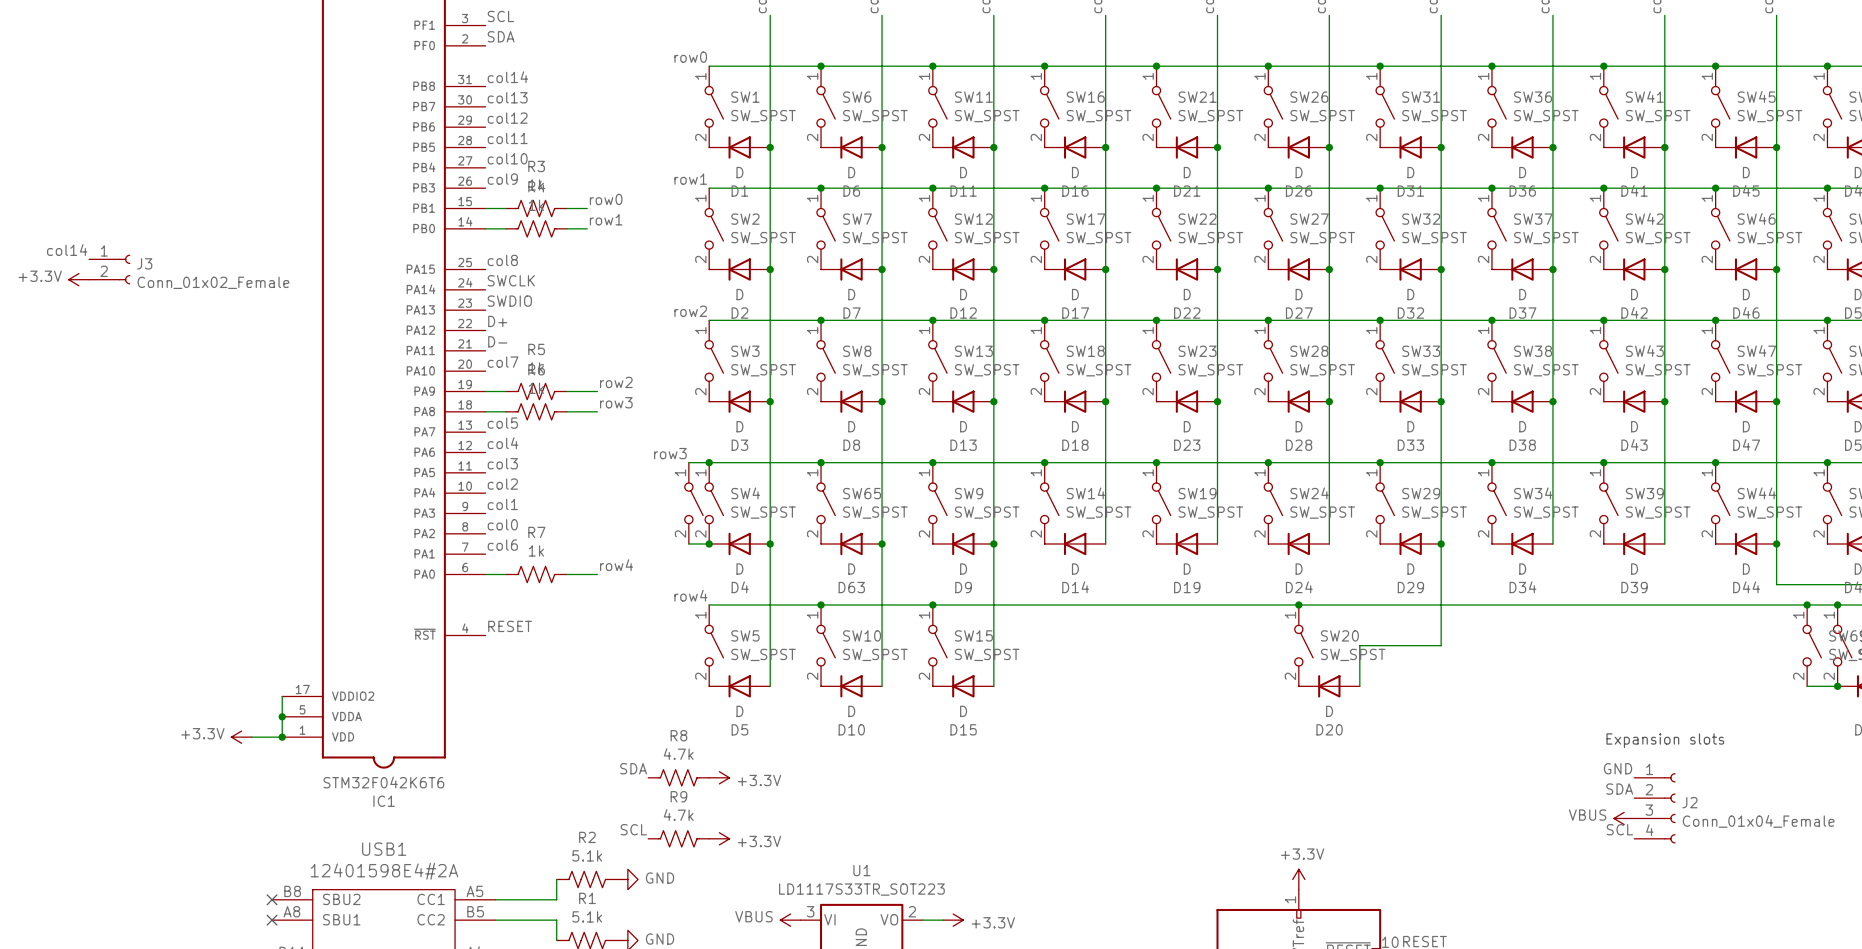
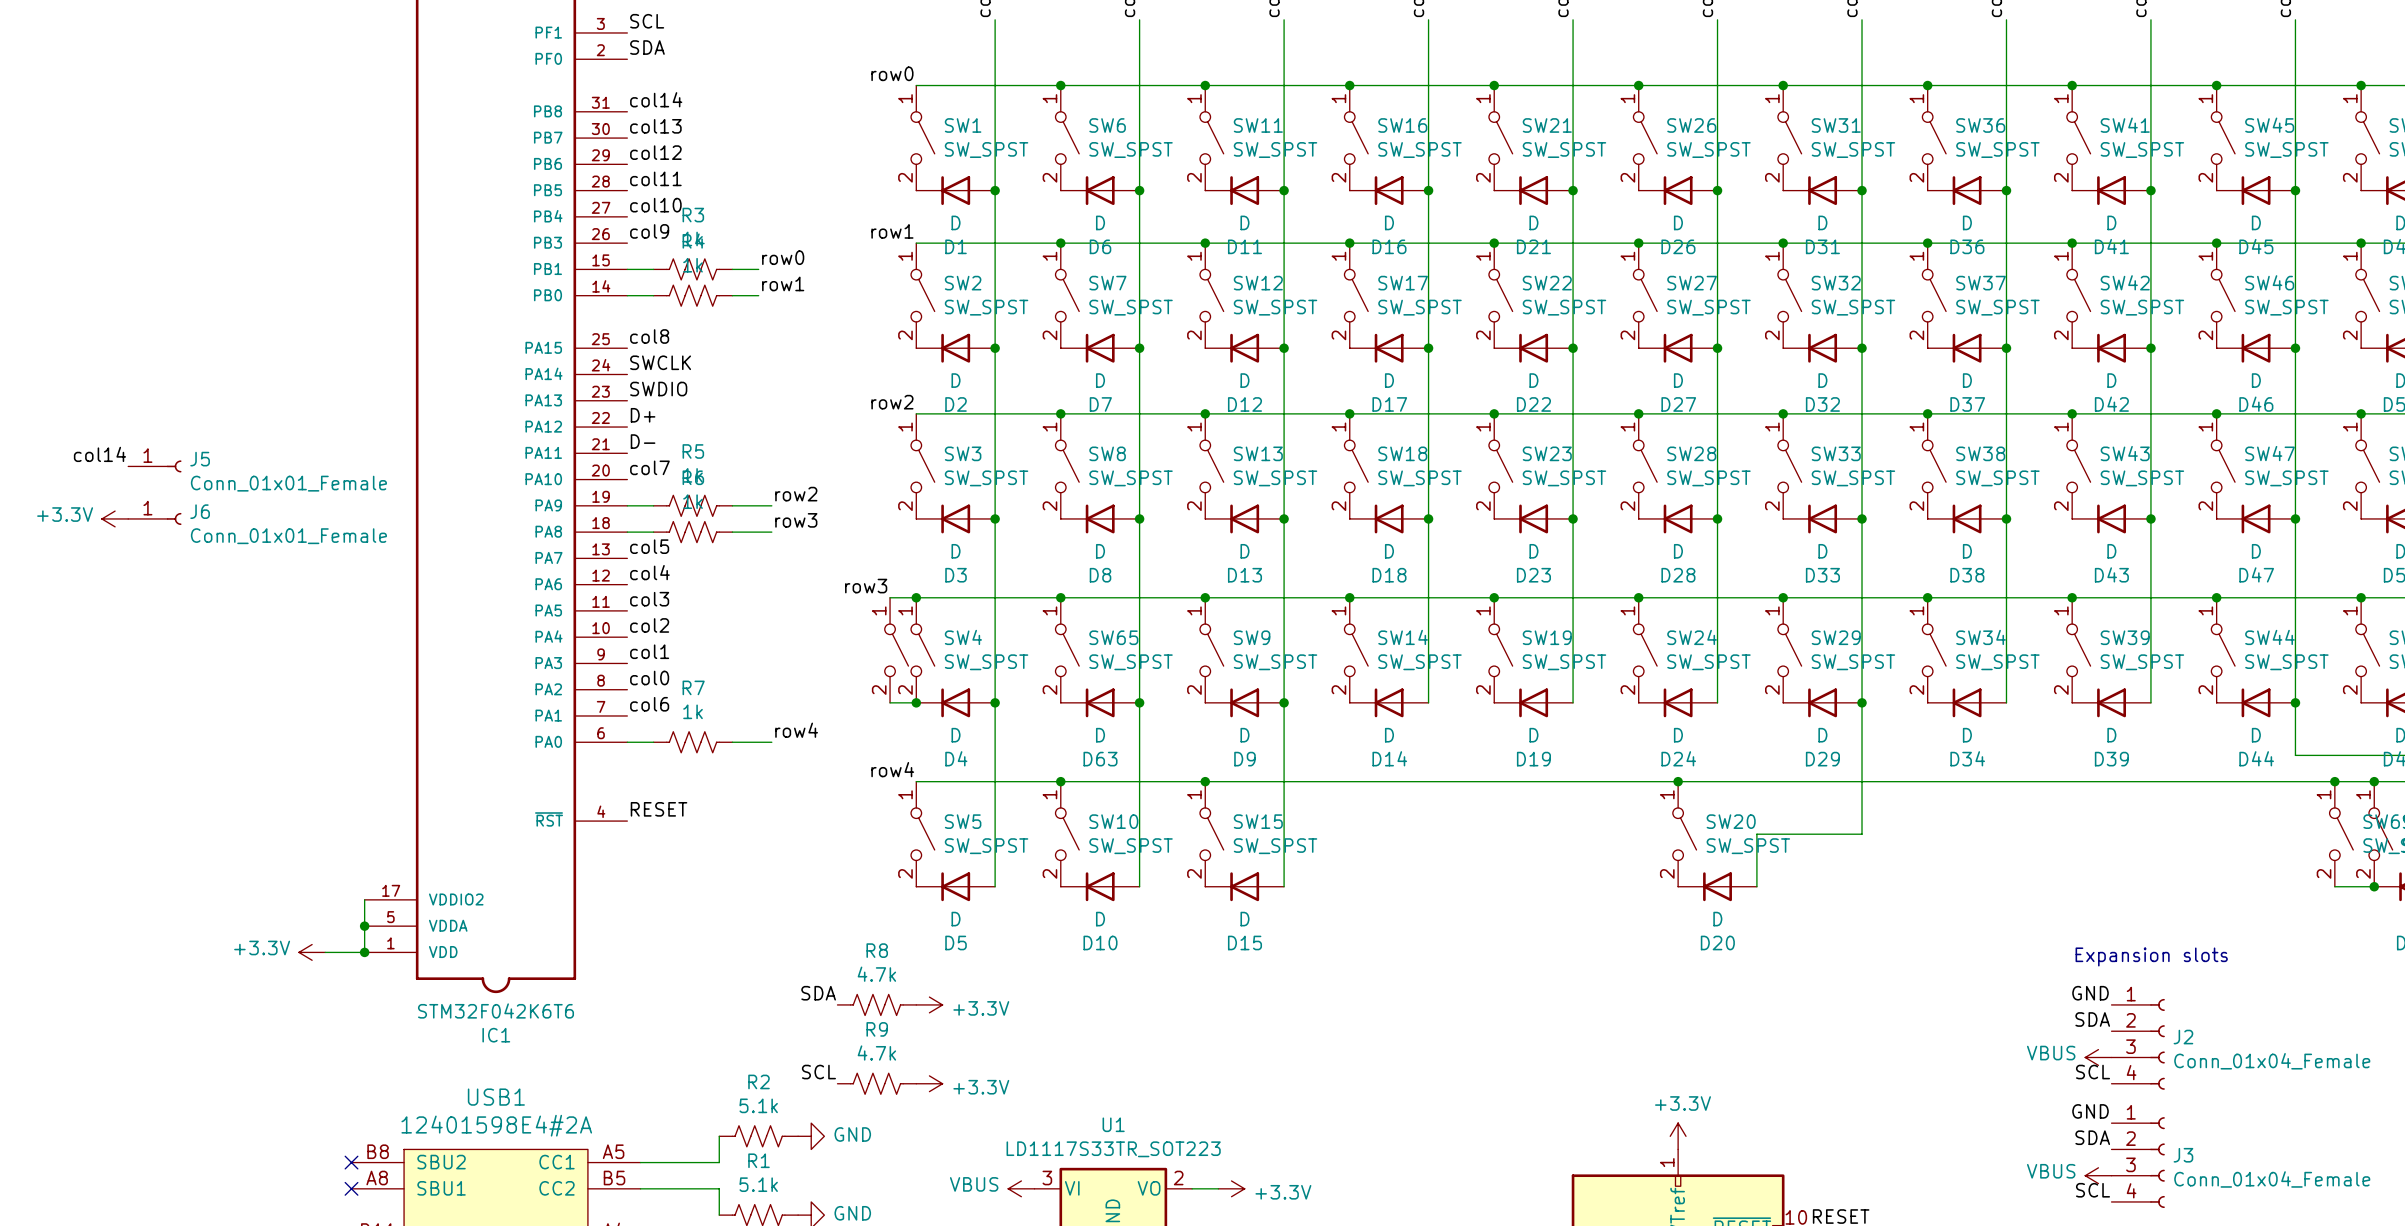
label position: col14 (67, 250) -> col14 (99, 454)
J3 symbol: [89, 254, 131, 285] -> [2111, 1117, 2165, 1209]
power symbol position: +3.3V (78, 279) -> +3.3V (115, 518)
J3 value: Conn_01x02_Female (213, 282) -> Conn_01x04_Female (2272, 1179)
J5: none -> Conn_01x01_Female (154, 466)
J6: none -> Conn_01x01_Female (154, 518)
label: none -> GND (2090, 1111)
label: none -> SDA (2092, 1137)
power symbol: none -> VBUS (2098, 1175)
label: none -> SCL (2093, 1190)

